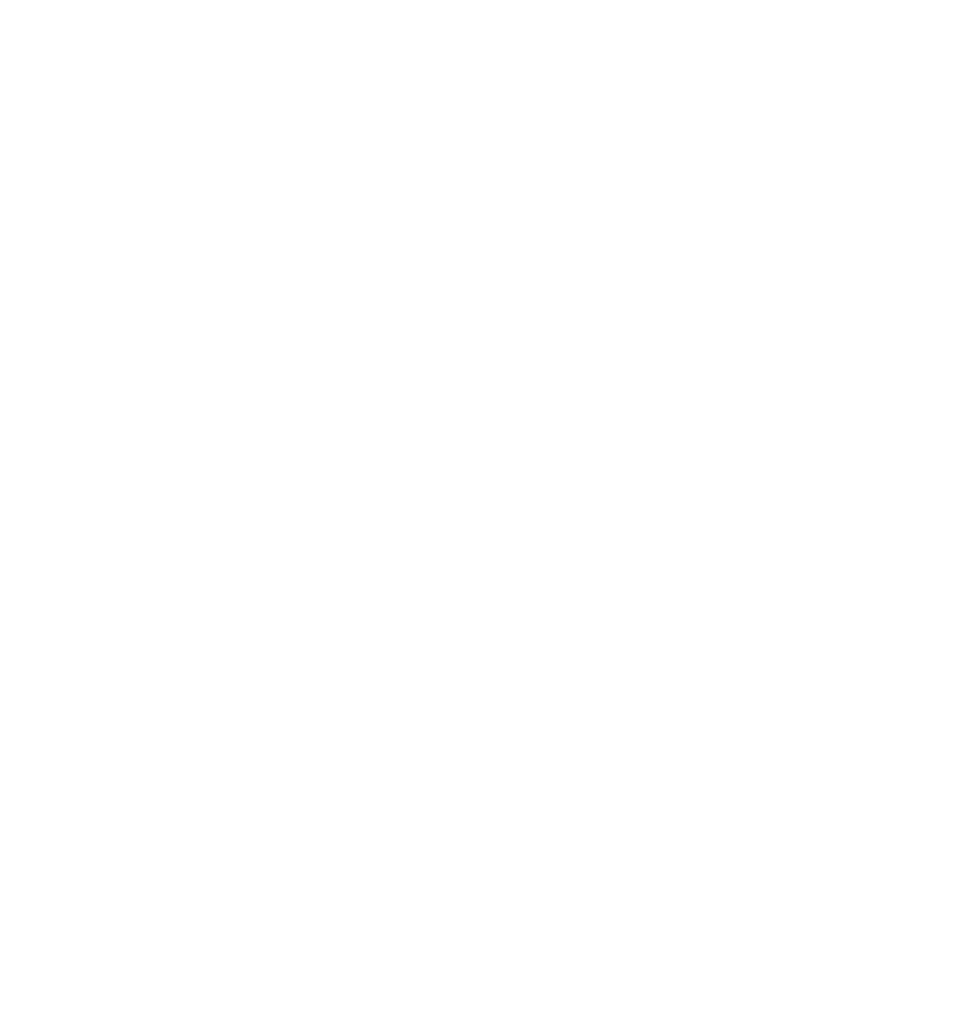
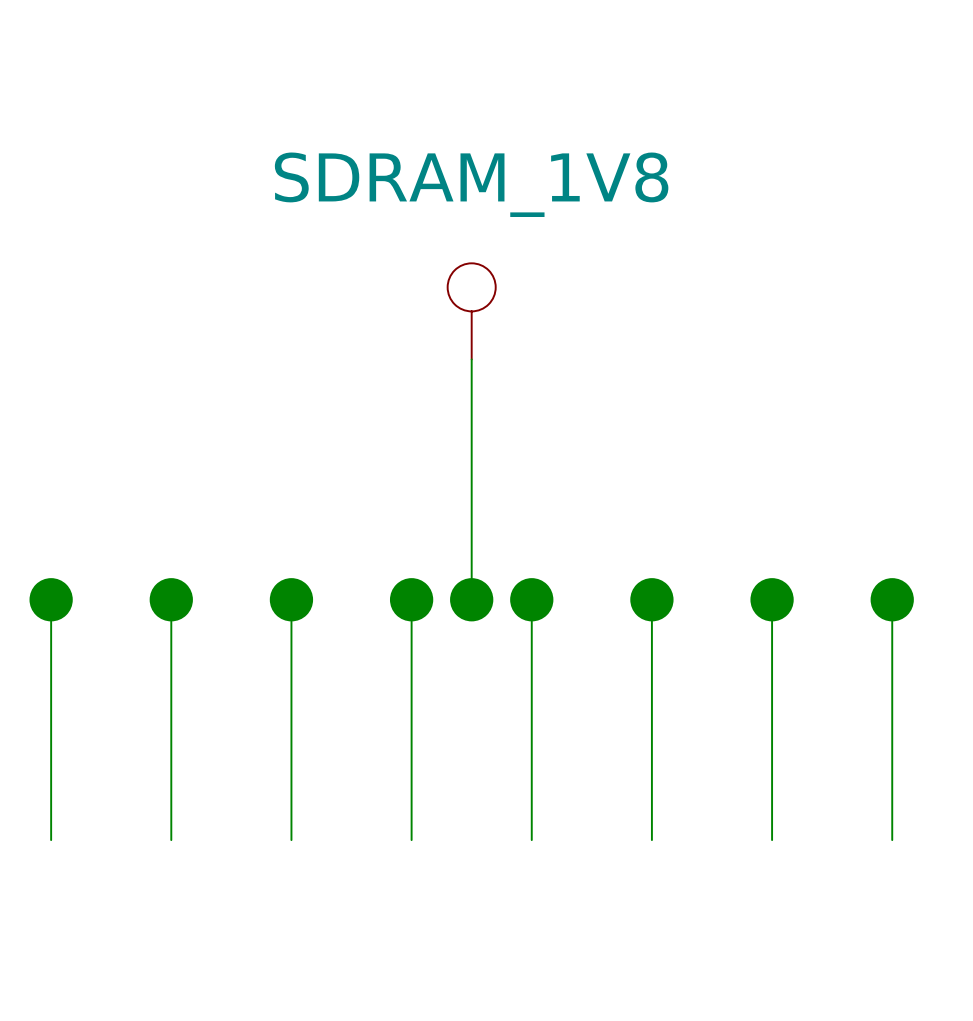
power symbol: none -> SDRAM_1V8 (471, 311)
wire: none -> (471, 359) (471, 599)
wire: none -> (51, 599) (51, 840)
junction: none -> (51, 599)
wire: none -> (171, 599) (171, 840)
junction: none -> (171, 599)
wire: none -> (291, 599) (291, 840)
junction: none -> (291, 599)
wire: none -> (411, 599) (411, 840)
junction: none -> (411, 599)
junction: none -> (471, 599)
wire: none -> (531, 599) (531, 840)
junction: none -> (531, 599)
wire: none -> (651, 599) (651, 840)
junction: none -> (651, 599)
wire: none -> (772, 599) (772, 840)
junction: none -> (772, 599)
wire: none -> (892, 599) (892, 840)
junction: none -> (892, 599)

